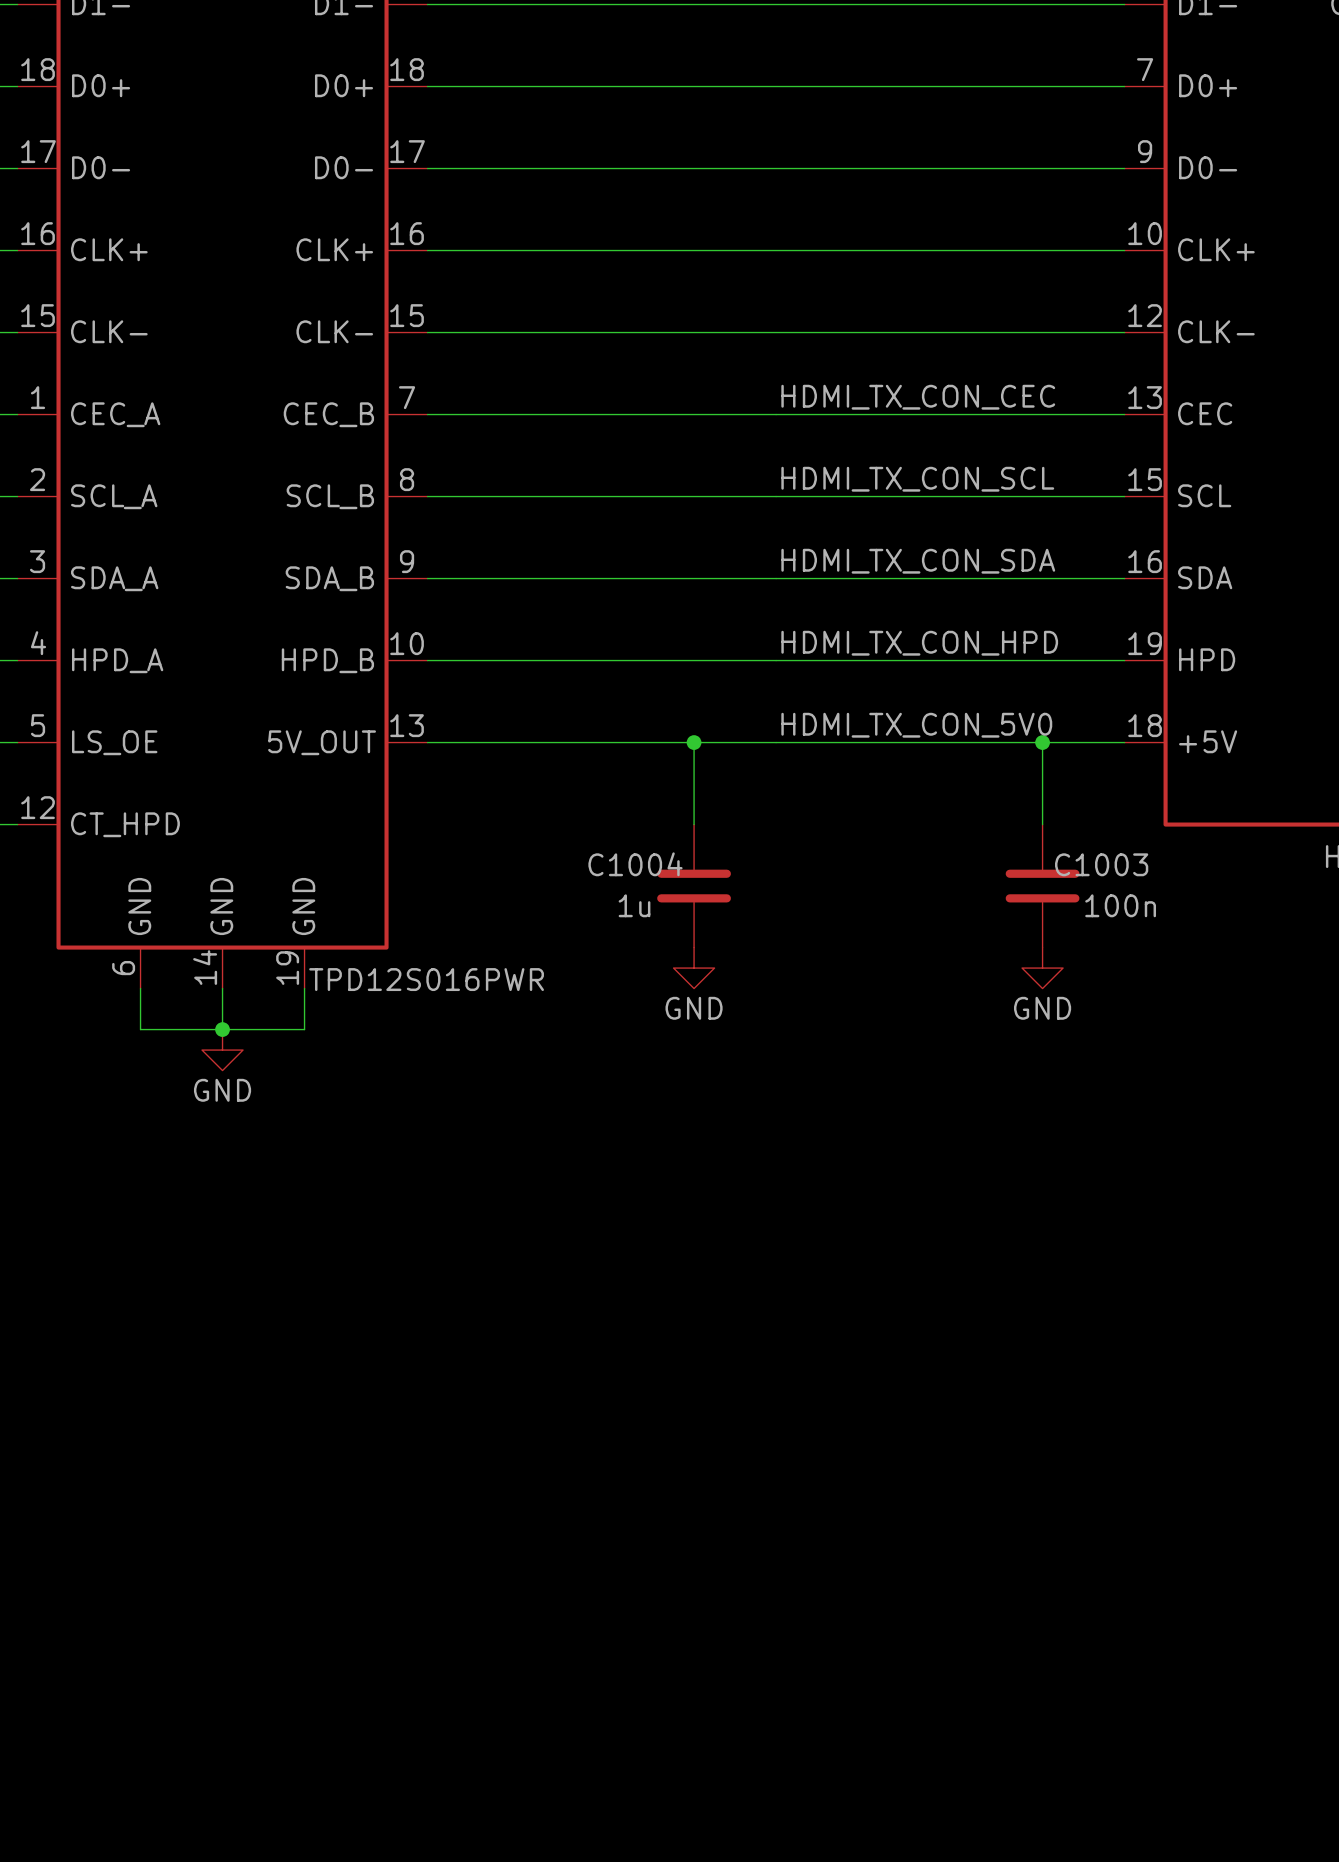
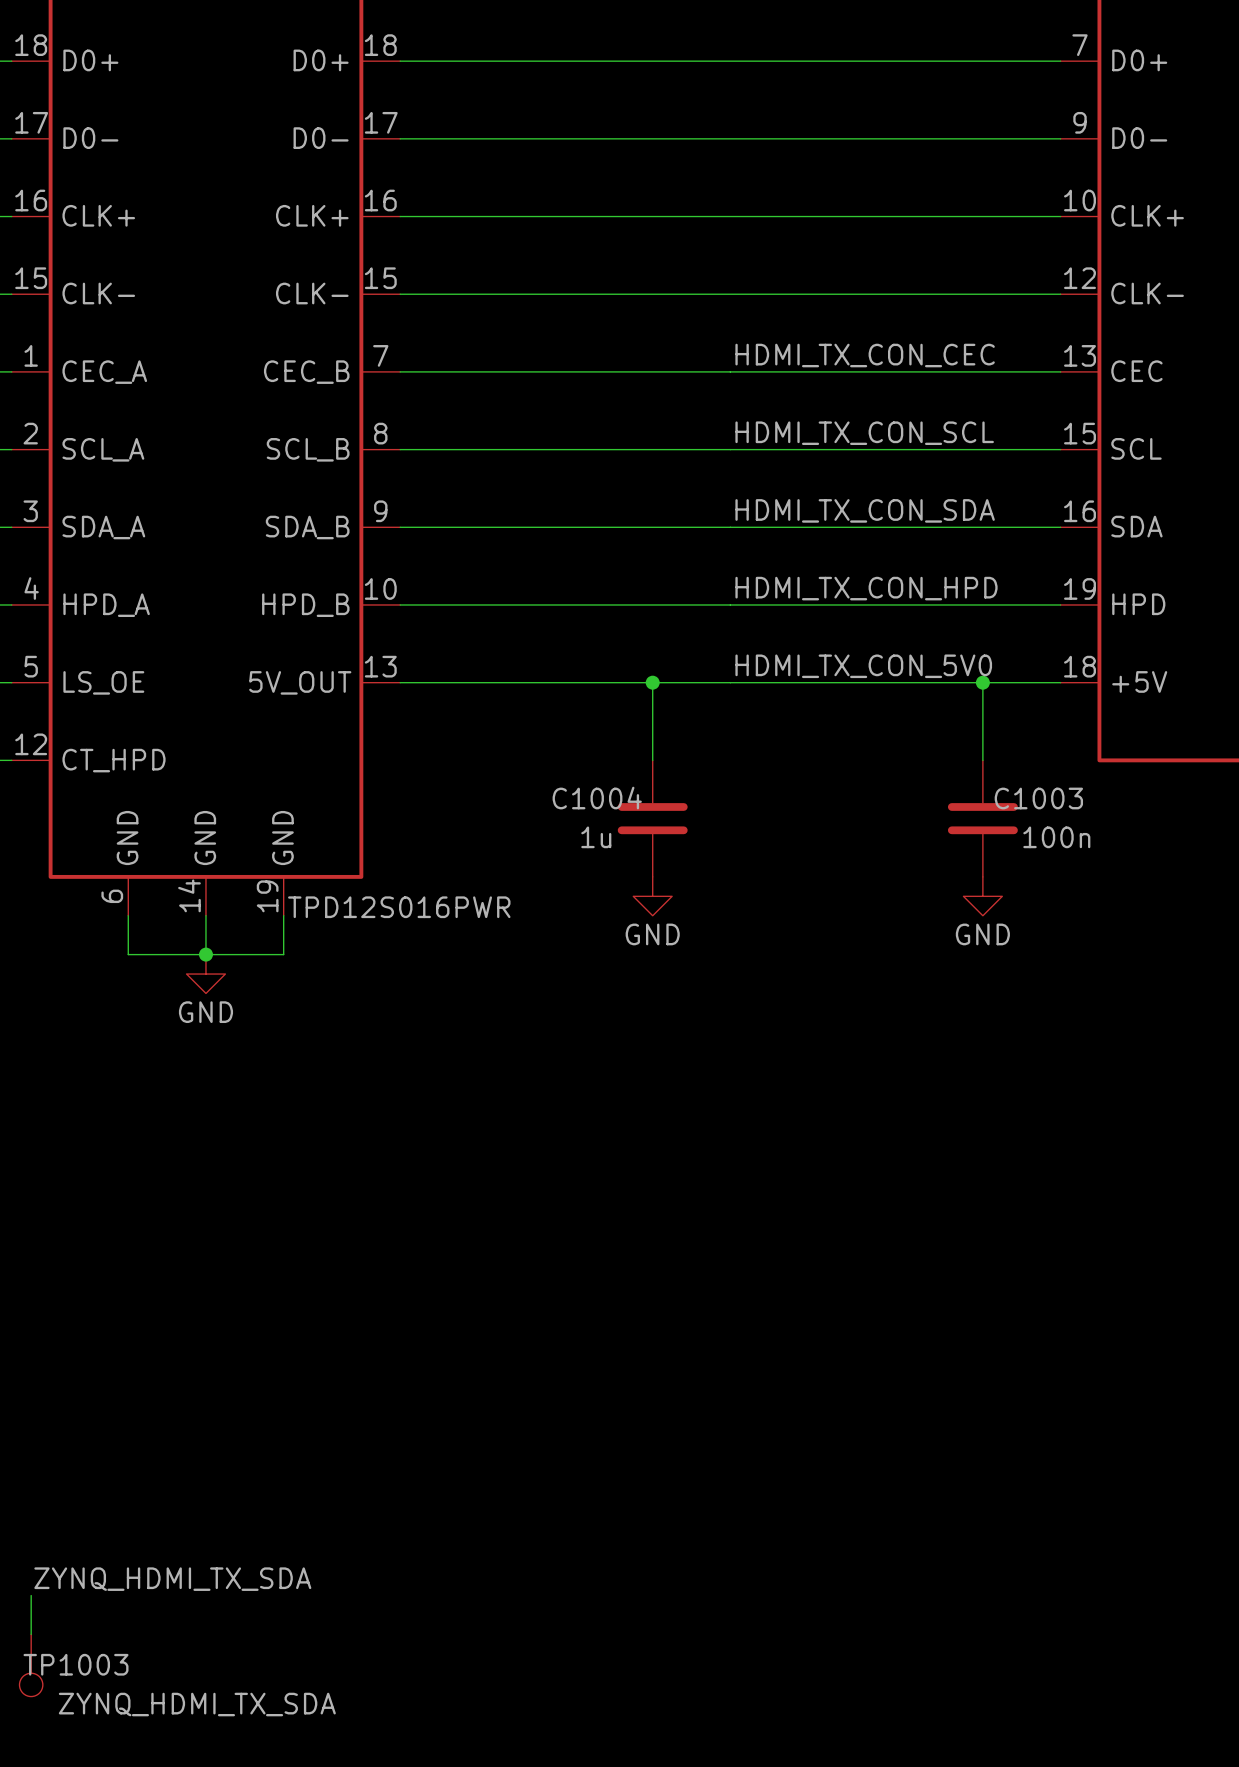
label: none -> ZYNQ_HDMI_TX_SDA (172, 1579)
wire: none -> (31, 1595) (31, 1634)
TP1003: none -> ZYNQ_HDMI_TX_SDA (31, 1665)

